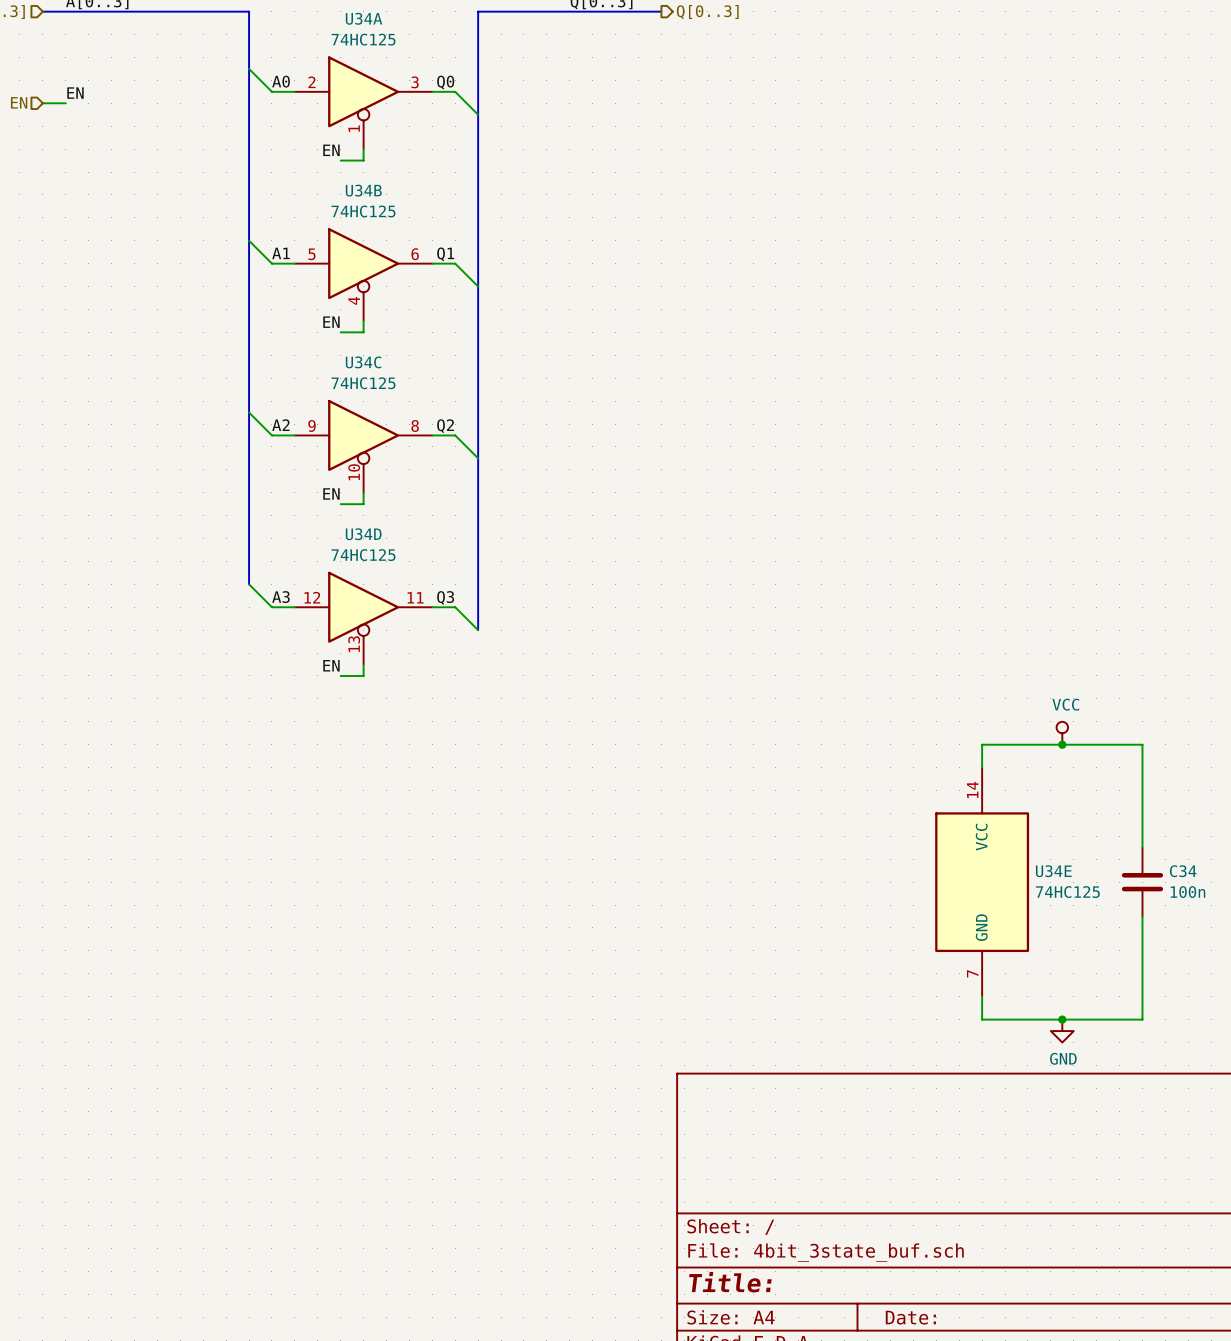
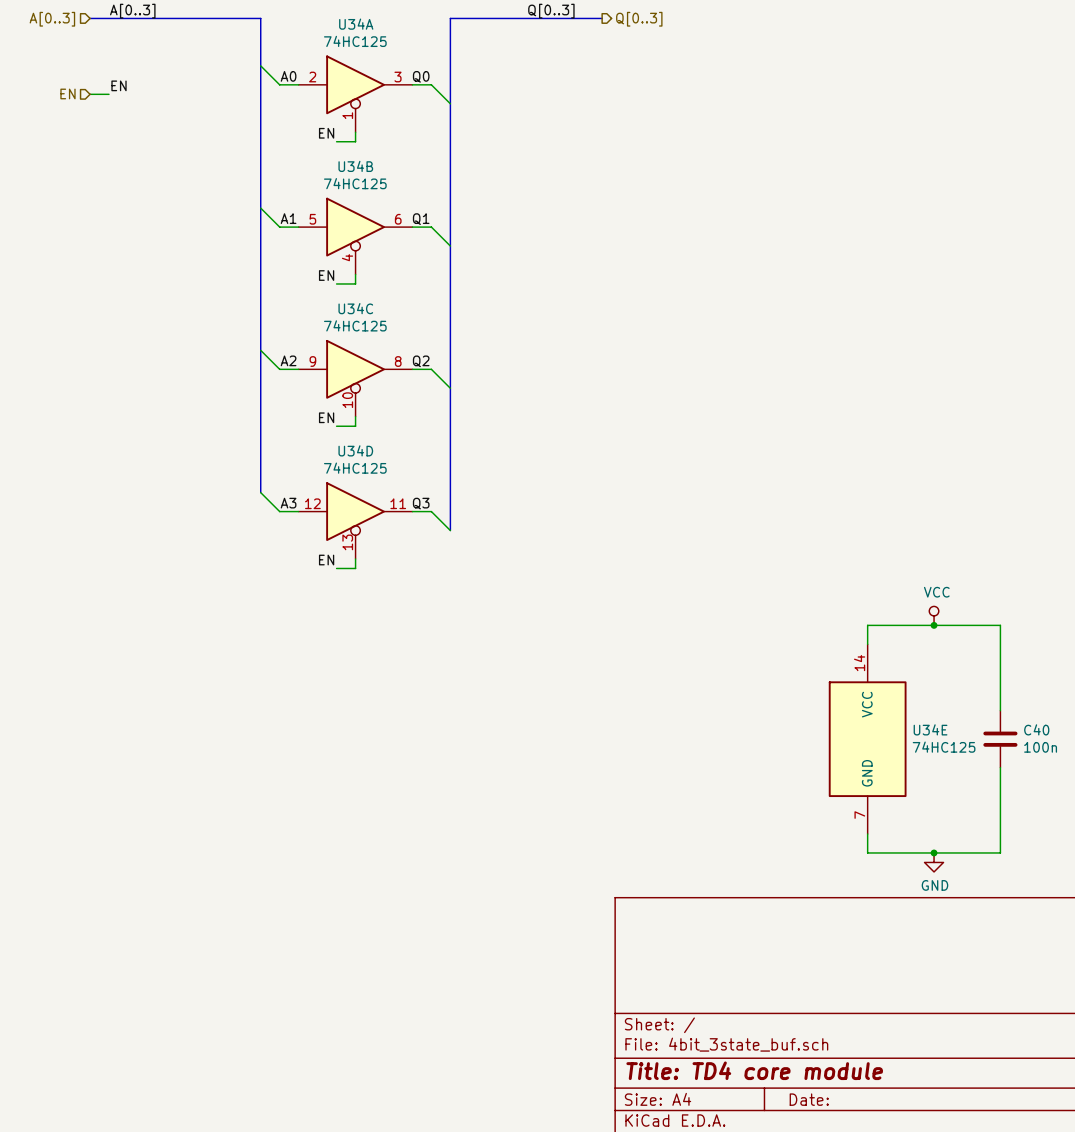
C34 name: C34 (1183, 871) -> C40 (1036, 729)
title block: Title: (730, 1282) -> Title: TD4 core module (754, 1070)

